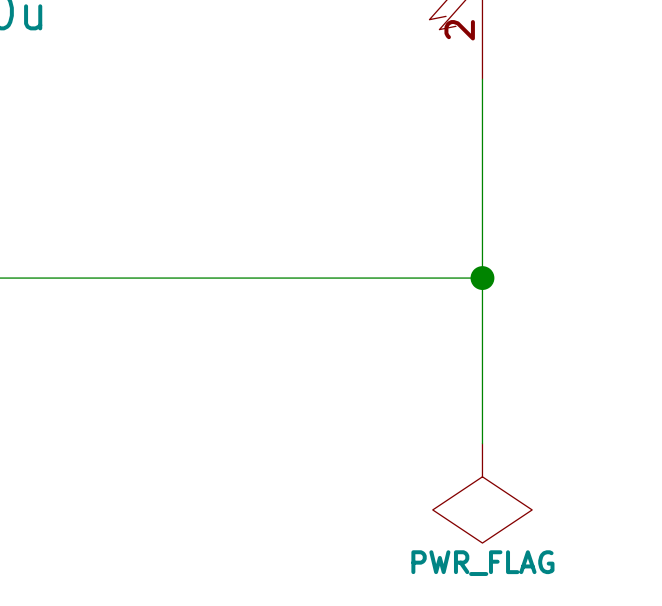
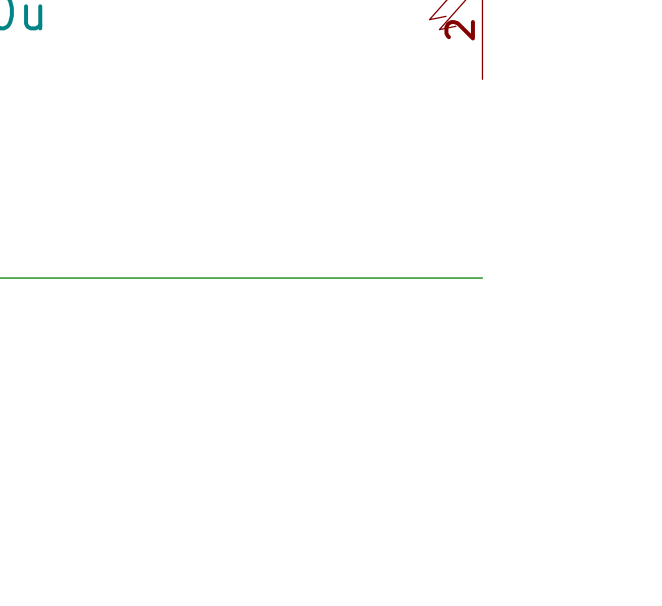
wire: (482, 79) (482, 443) -> none
junction: (482, 278) -> none
power symbol: PWR_FLAG (482, 493) -> none

